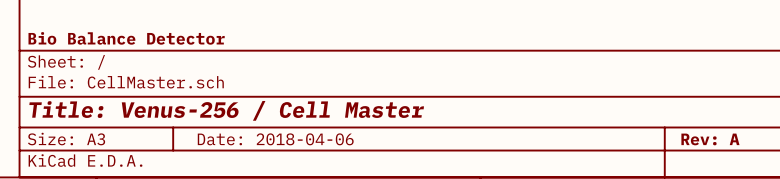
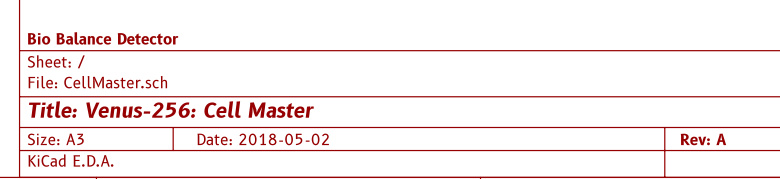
title block: Title: Venus-256 / Cell Master (226, 110) -> Title: Venus-256: Cell Master (171, 109)
title block: Date: 2018-04-06 (275, 139) -> Date: 2018-05-02 (263, 139)

